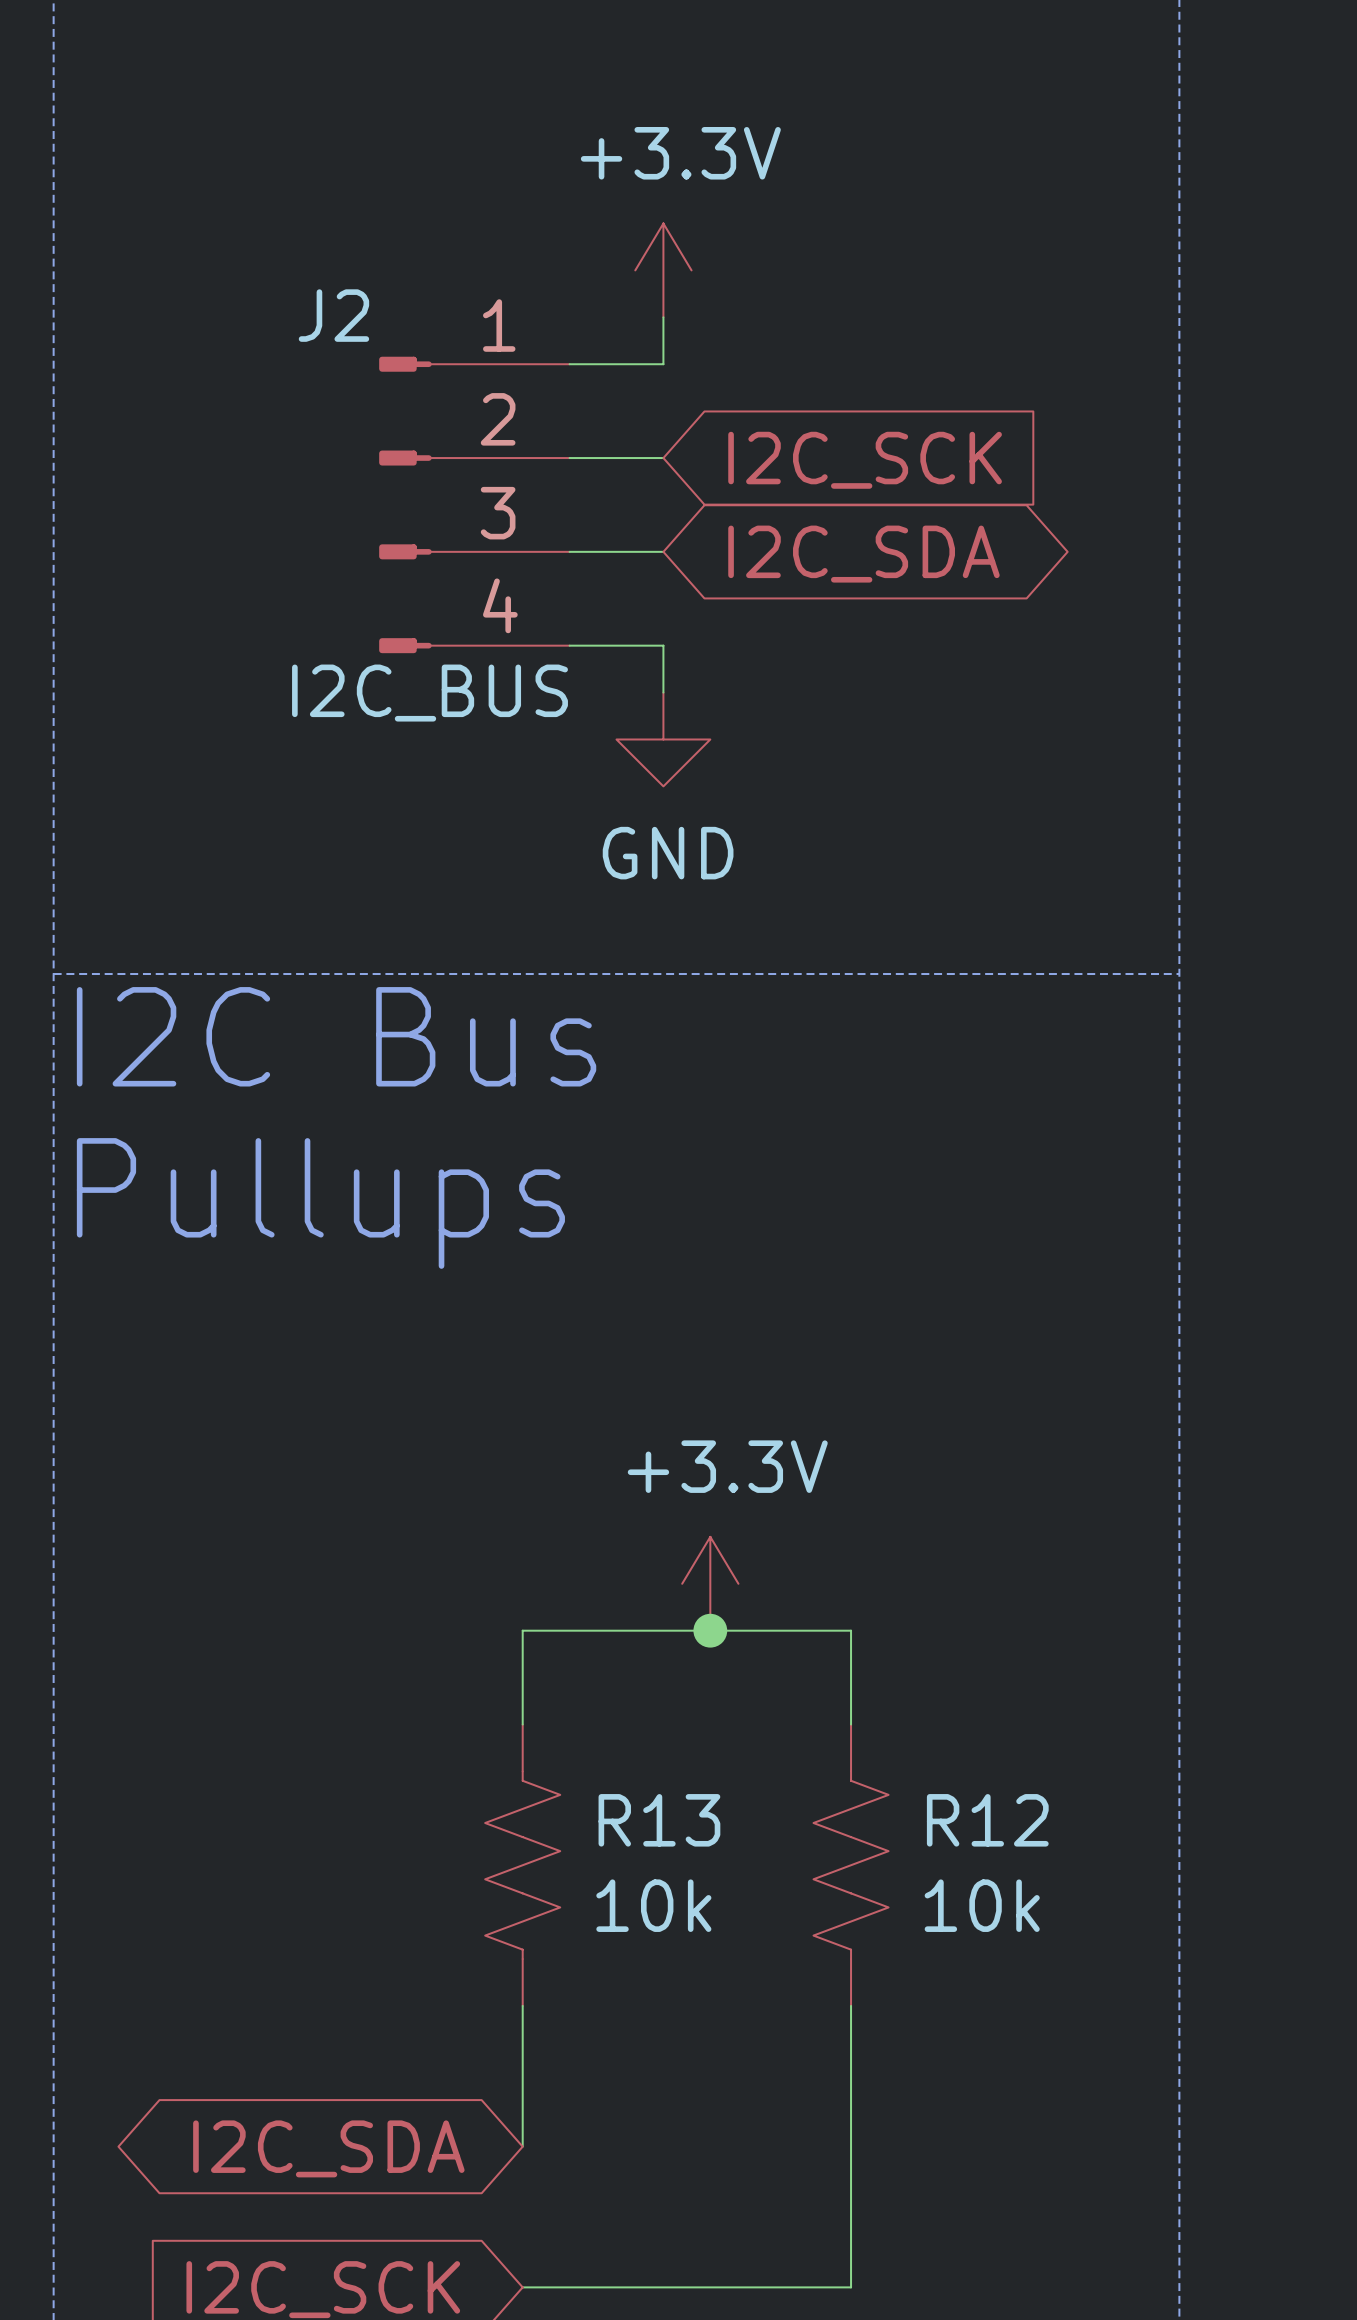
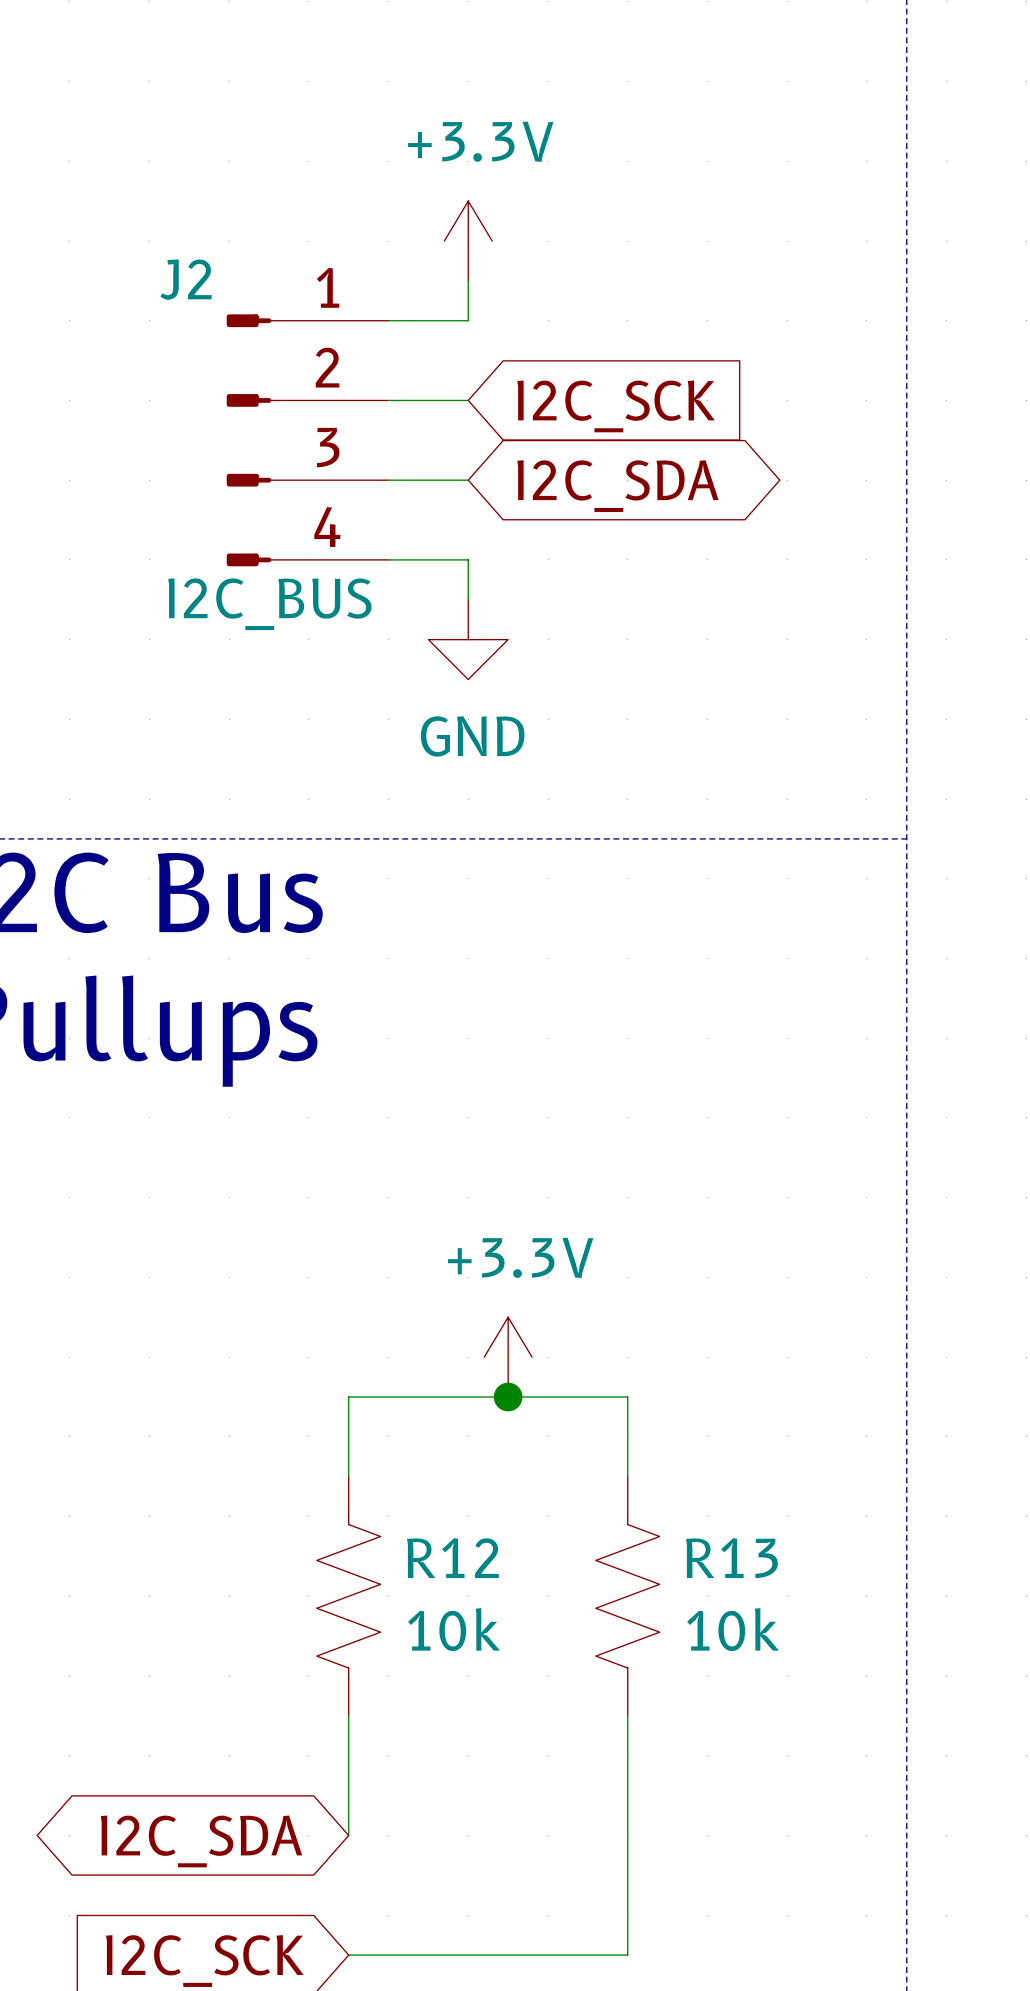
R13 name: R13 (659, 1820) -> R12 (452, 1558)
R12 name: R12 (987, 1820) -> R13 (731, 1558)

